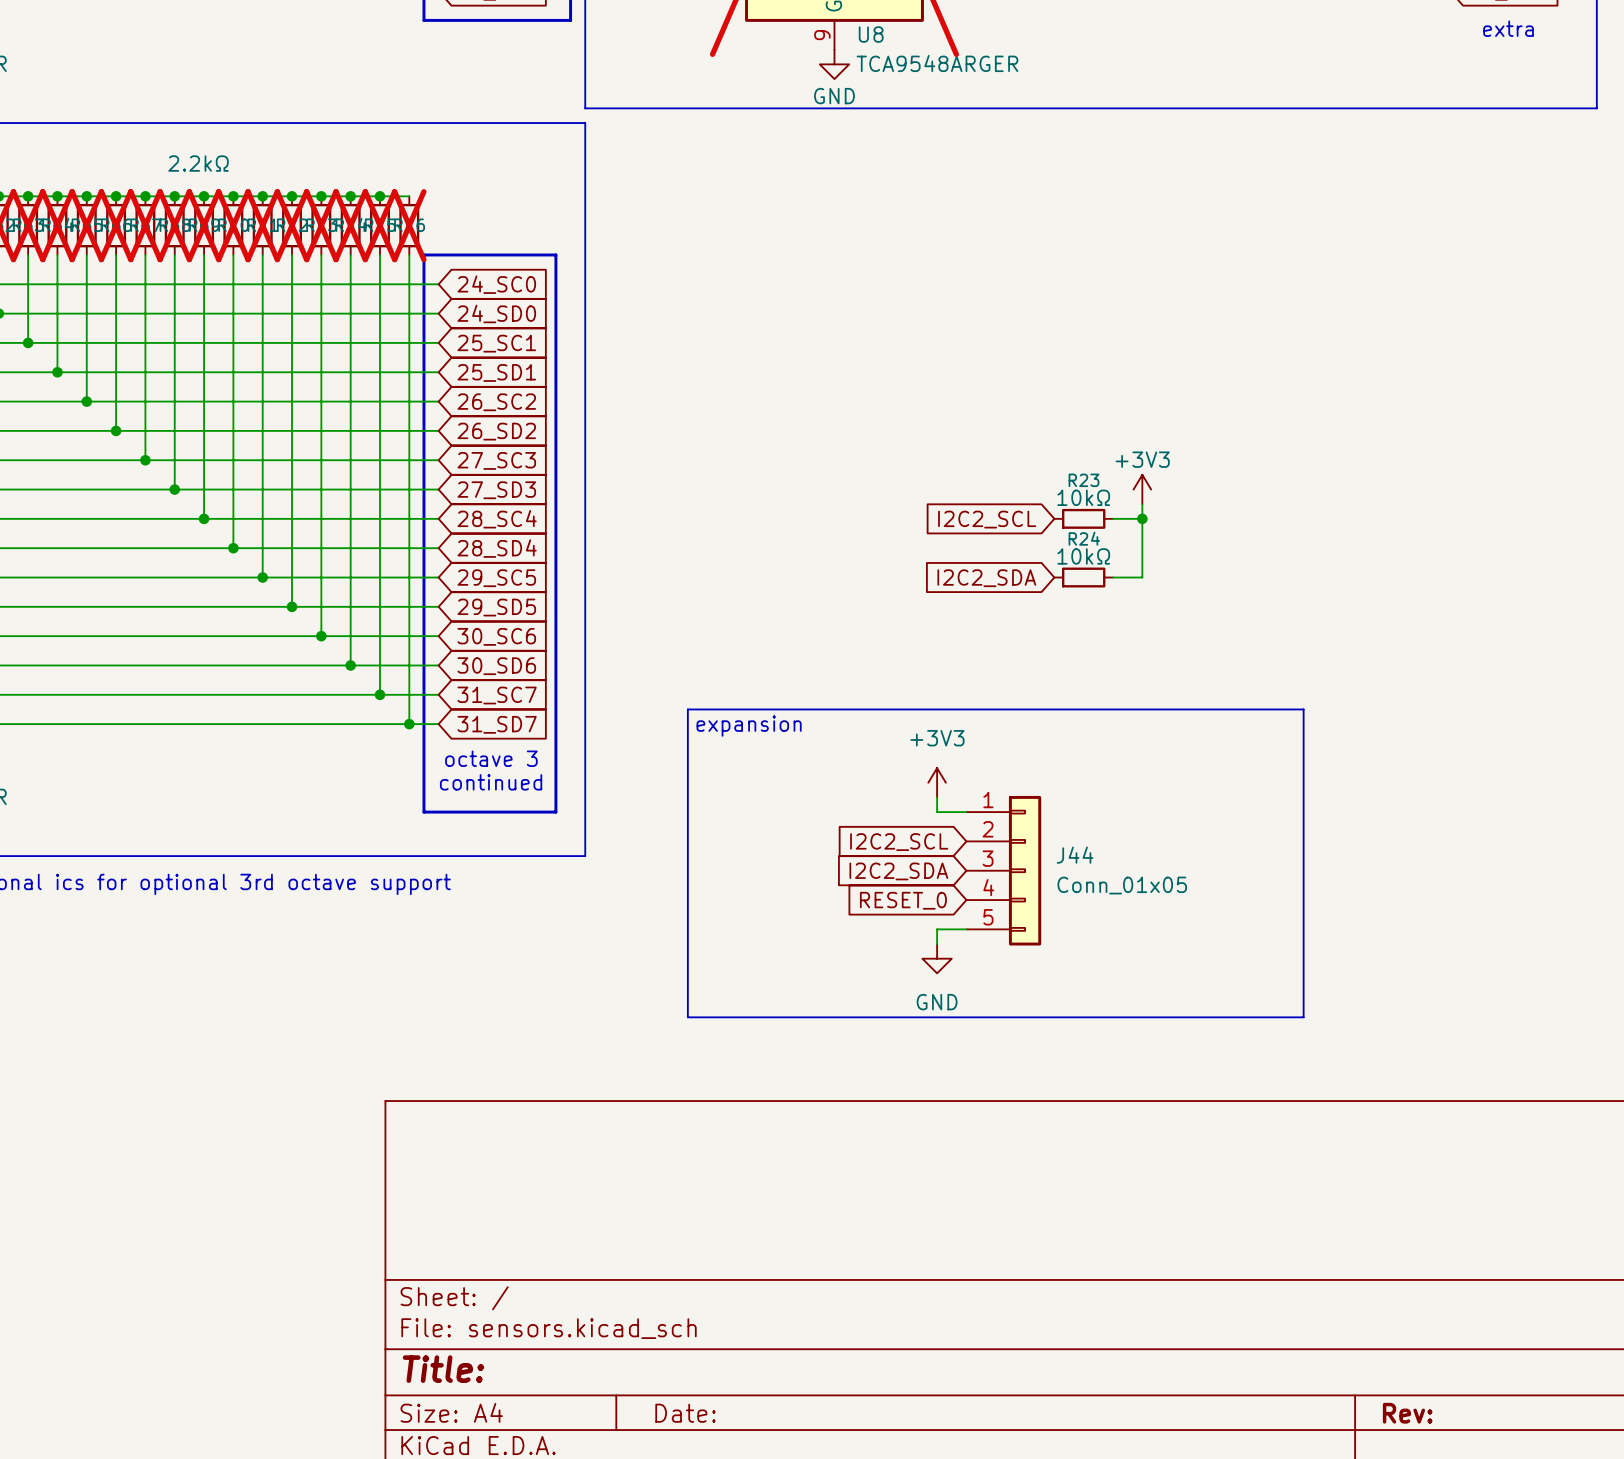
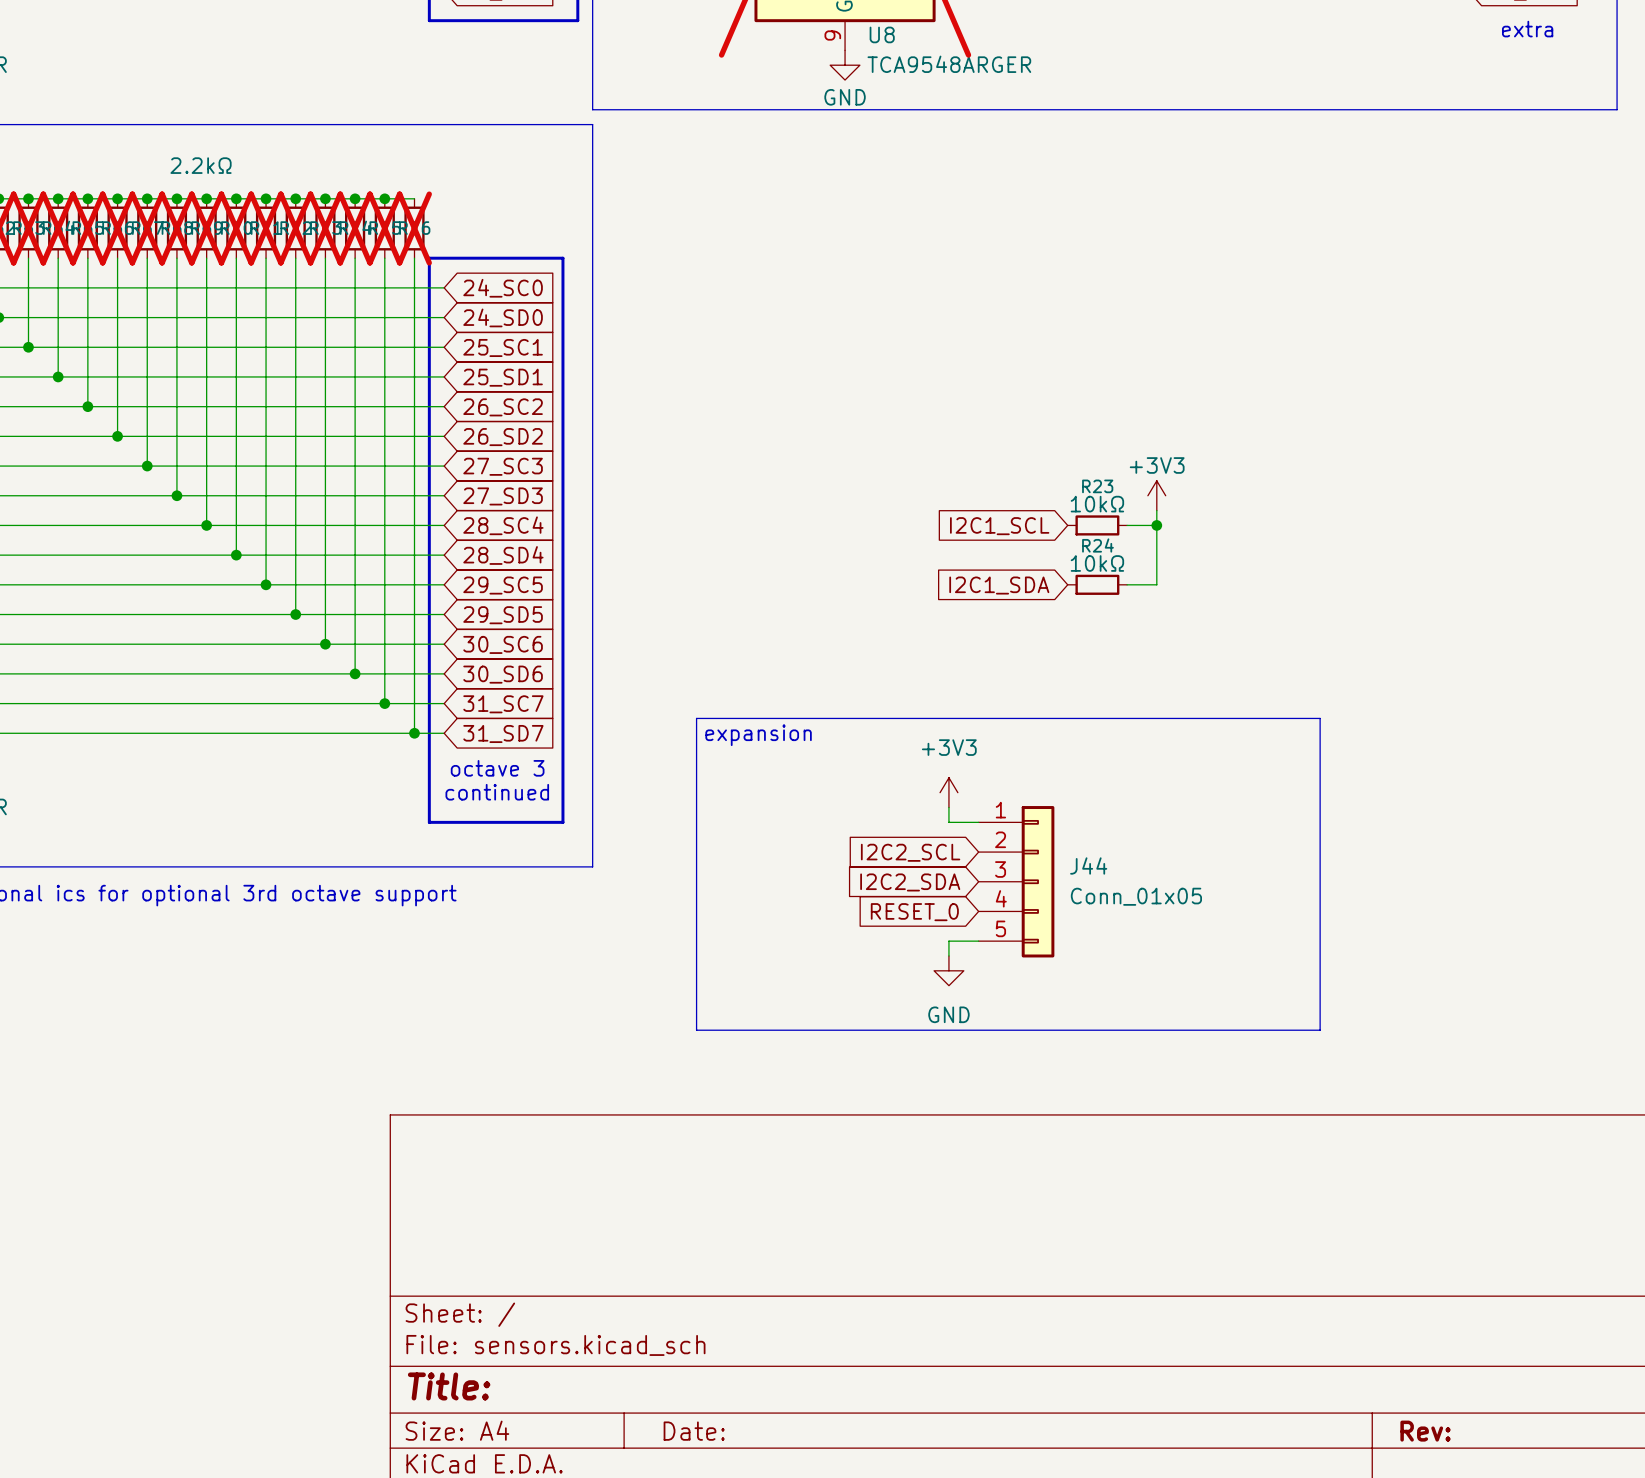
global label: I2C2_SCL (987, 519) -> I2C1_SCL (999, 526)
global label: I2C2_SDA (986, 578) -> I2C1_SDA (999, 585)

